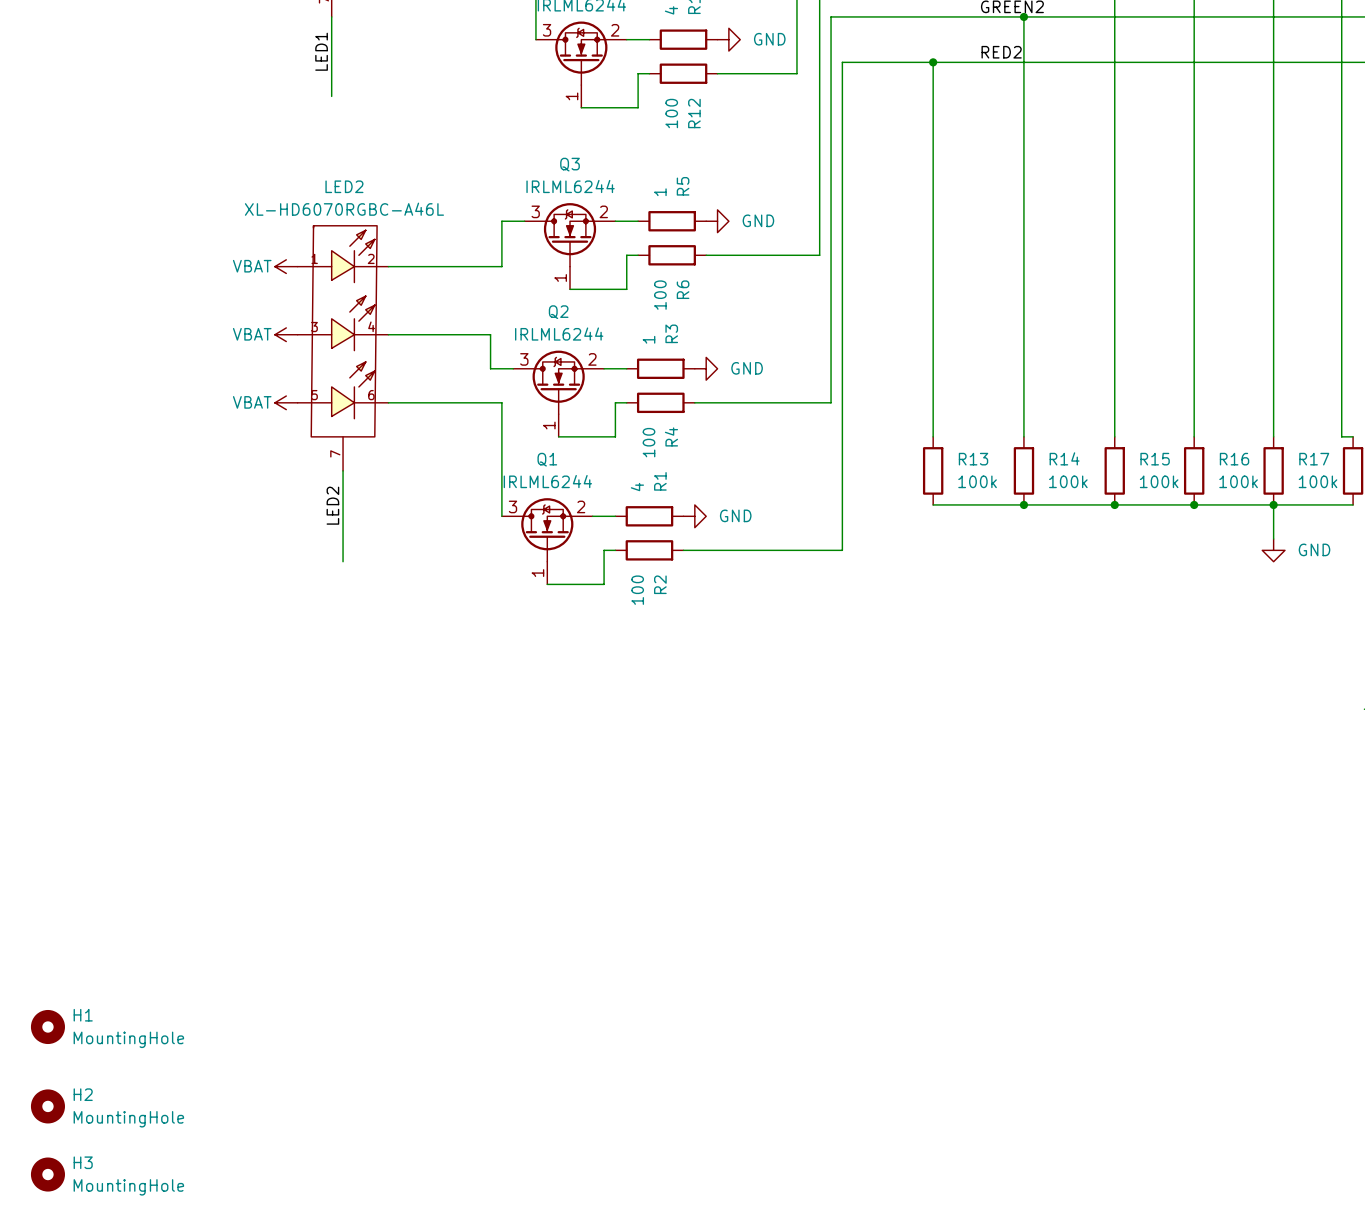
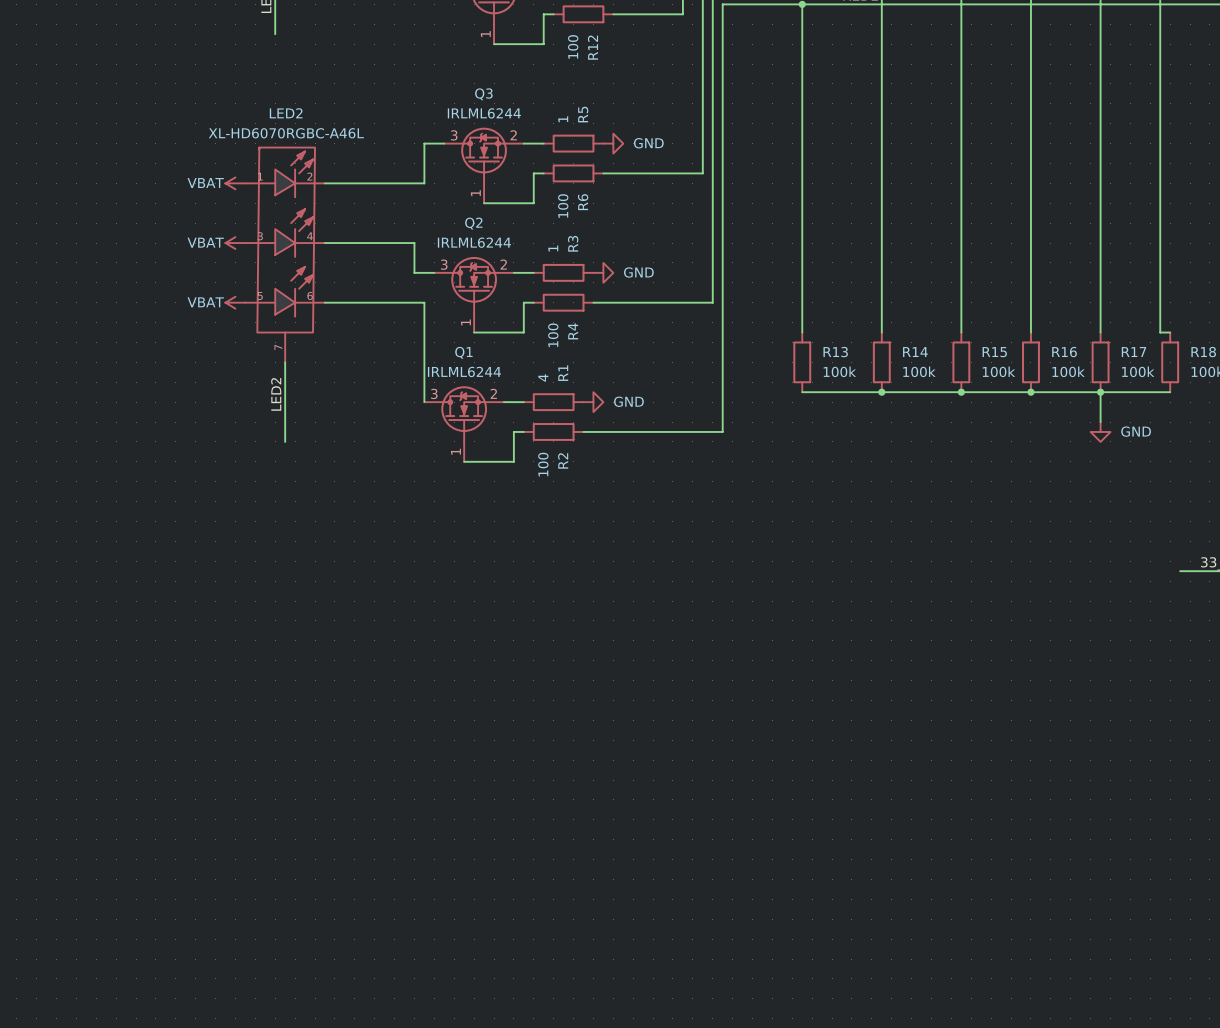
H1: MountingHole (47, 1027) -> none
H2: MountingHole (47, 1106) -> none
H3: MountingHole (47, 1174) -> none

